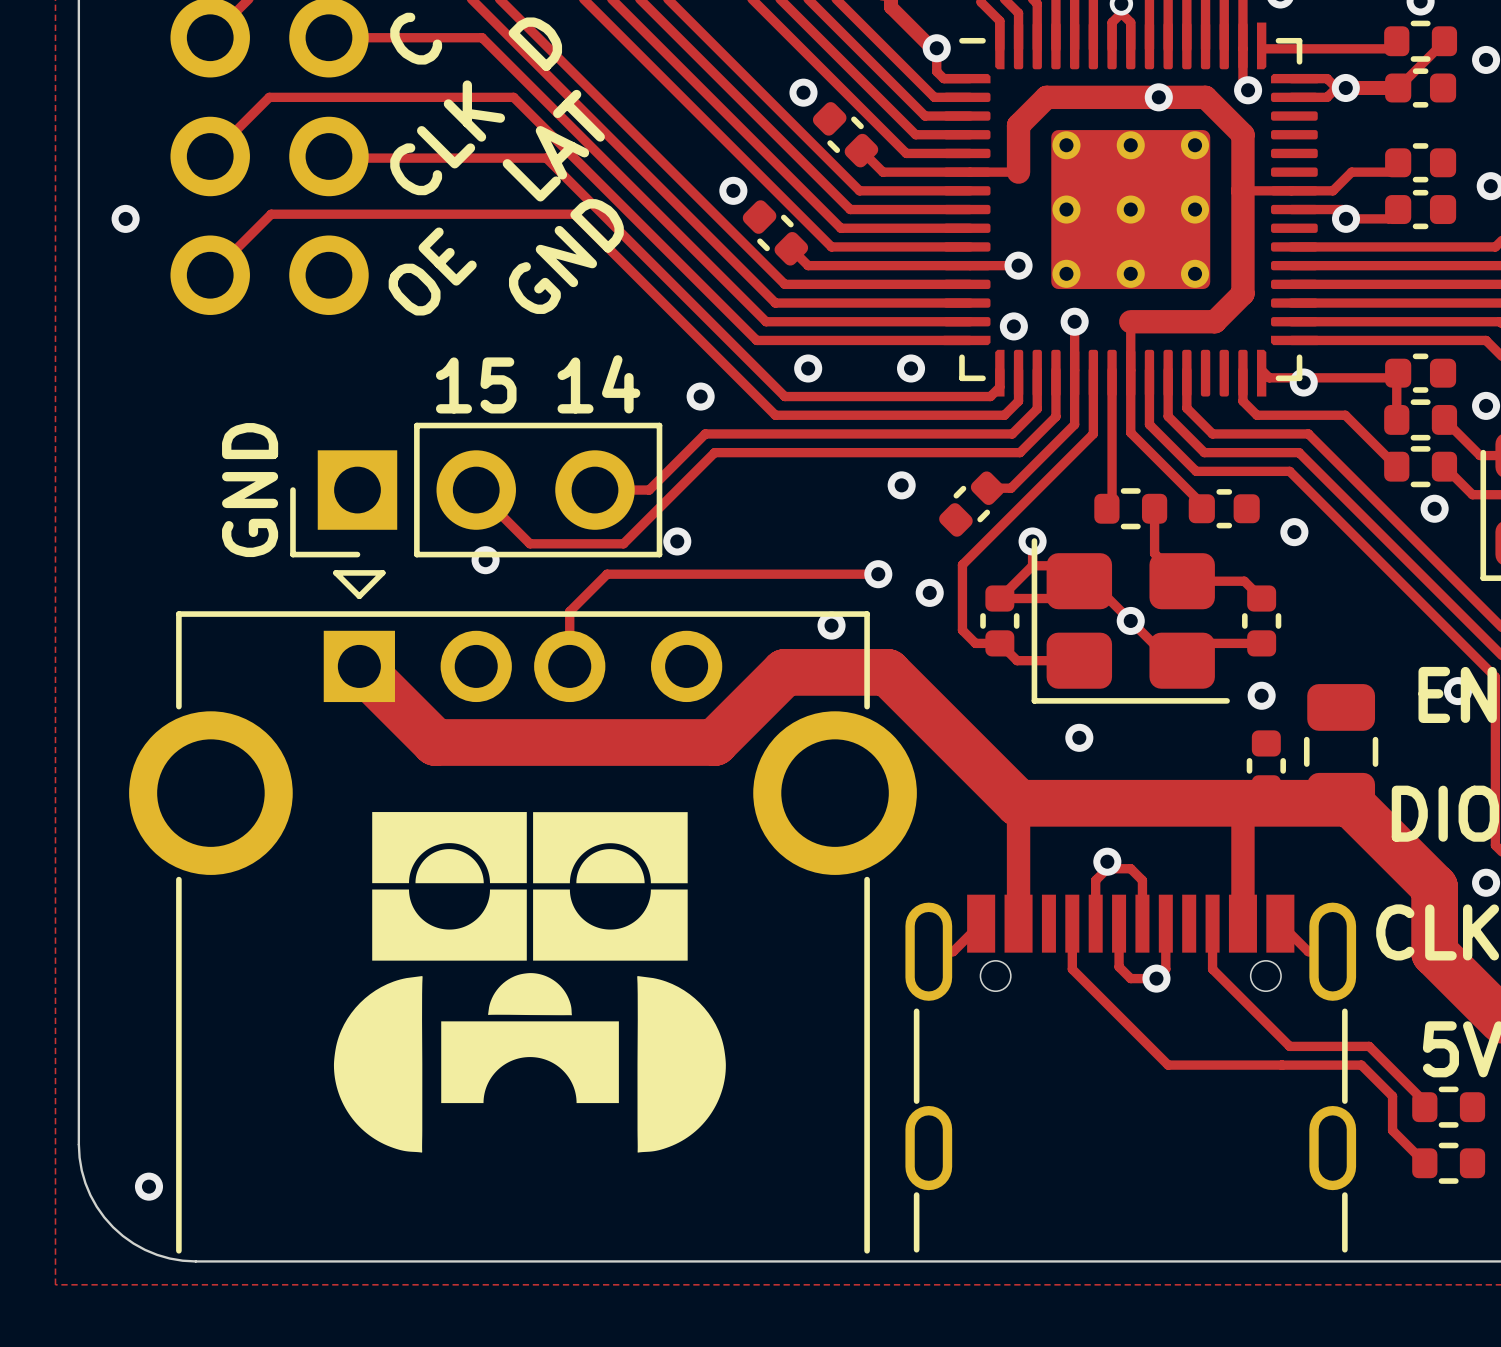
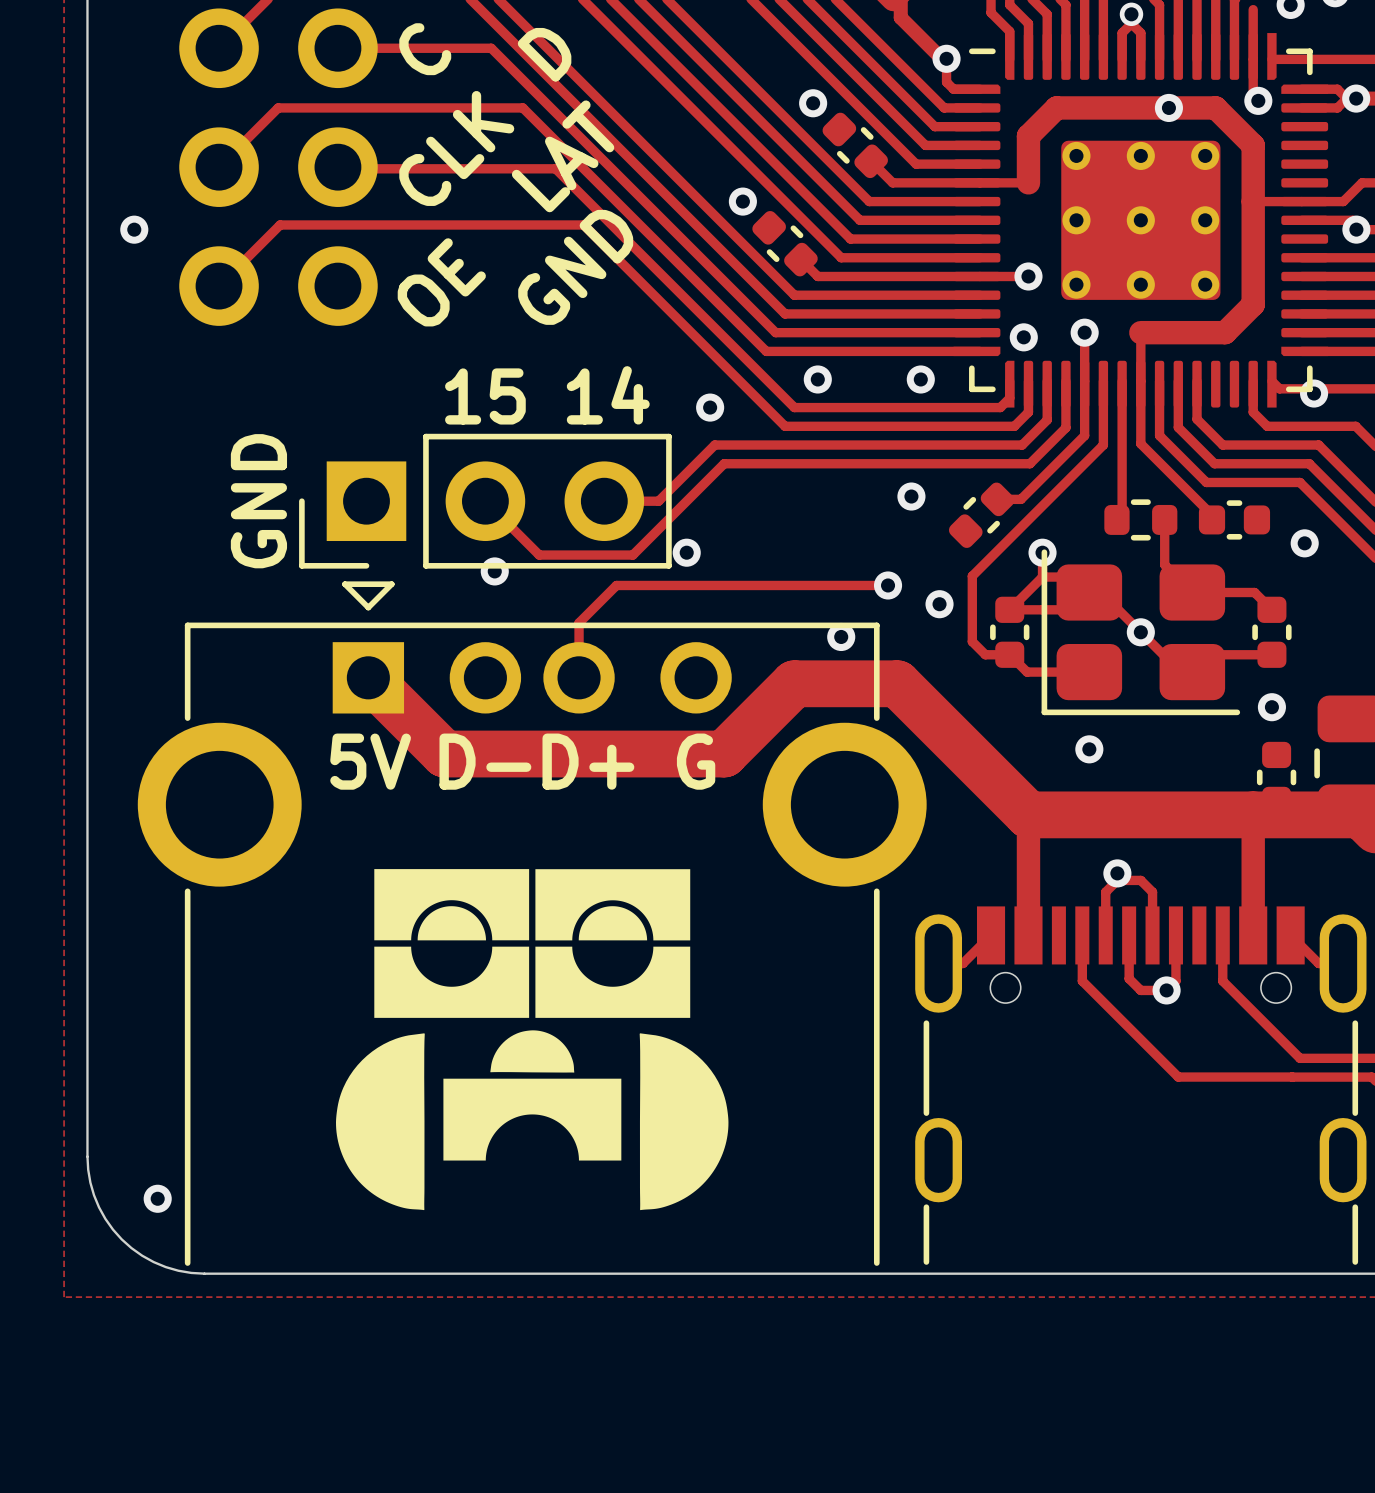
text: none -> 5V (370, 761)
text: none -> D- (485, 761)
text: none -> D+ (588, 761)
text: none -> G (696, 761)
drawing position: (449, 847) -> (451, 904)
drawing position: (610, 847) -> (612, 904)
drawing position: (449, 866) -> (451, 923)
drawing position: (610, 866) -> (612, 923)
drawing position: (449, 925) -> (451, 982)
drawing position: (610, 925) -> (612, 982)
drawing position: (529, 994) -> (532, 1051)
drawing position: (530, 1062) -> (532, 1119)
drawing position: (378, 1064) -> (380, 1121)
drawing position: (681, 1064) -> (684, 1121)

